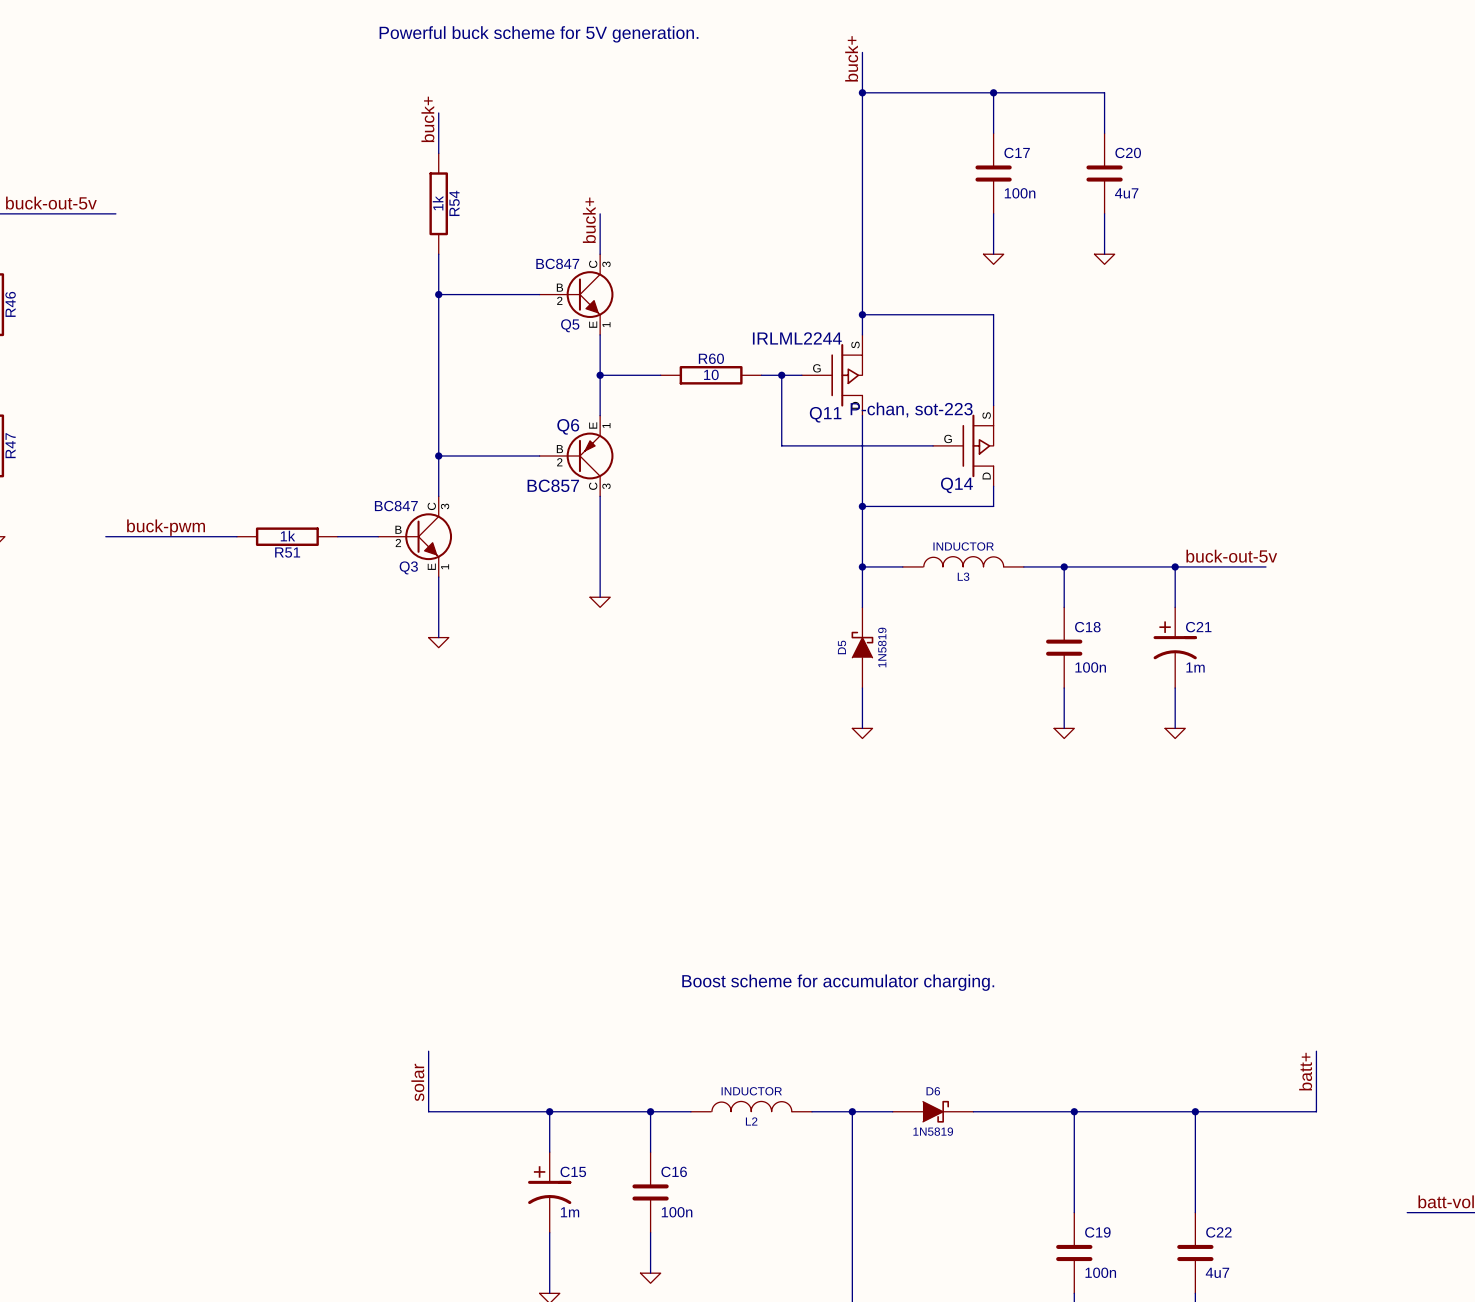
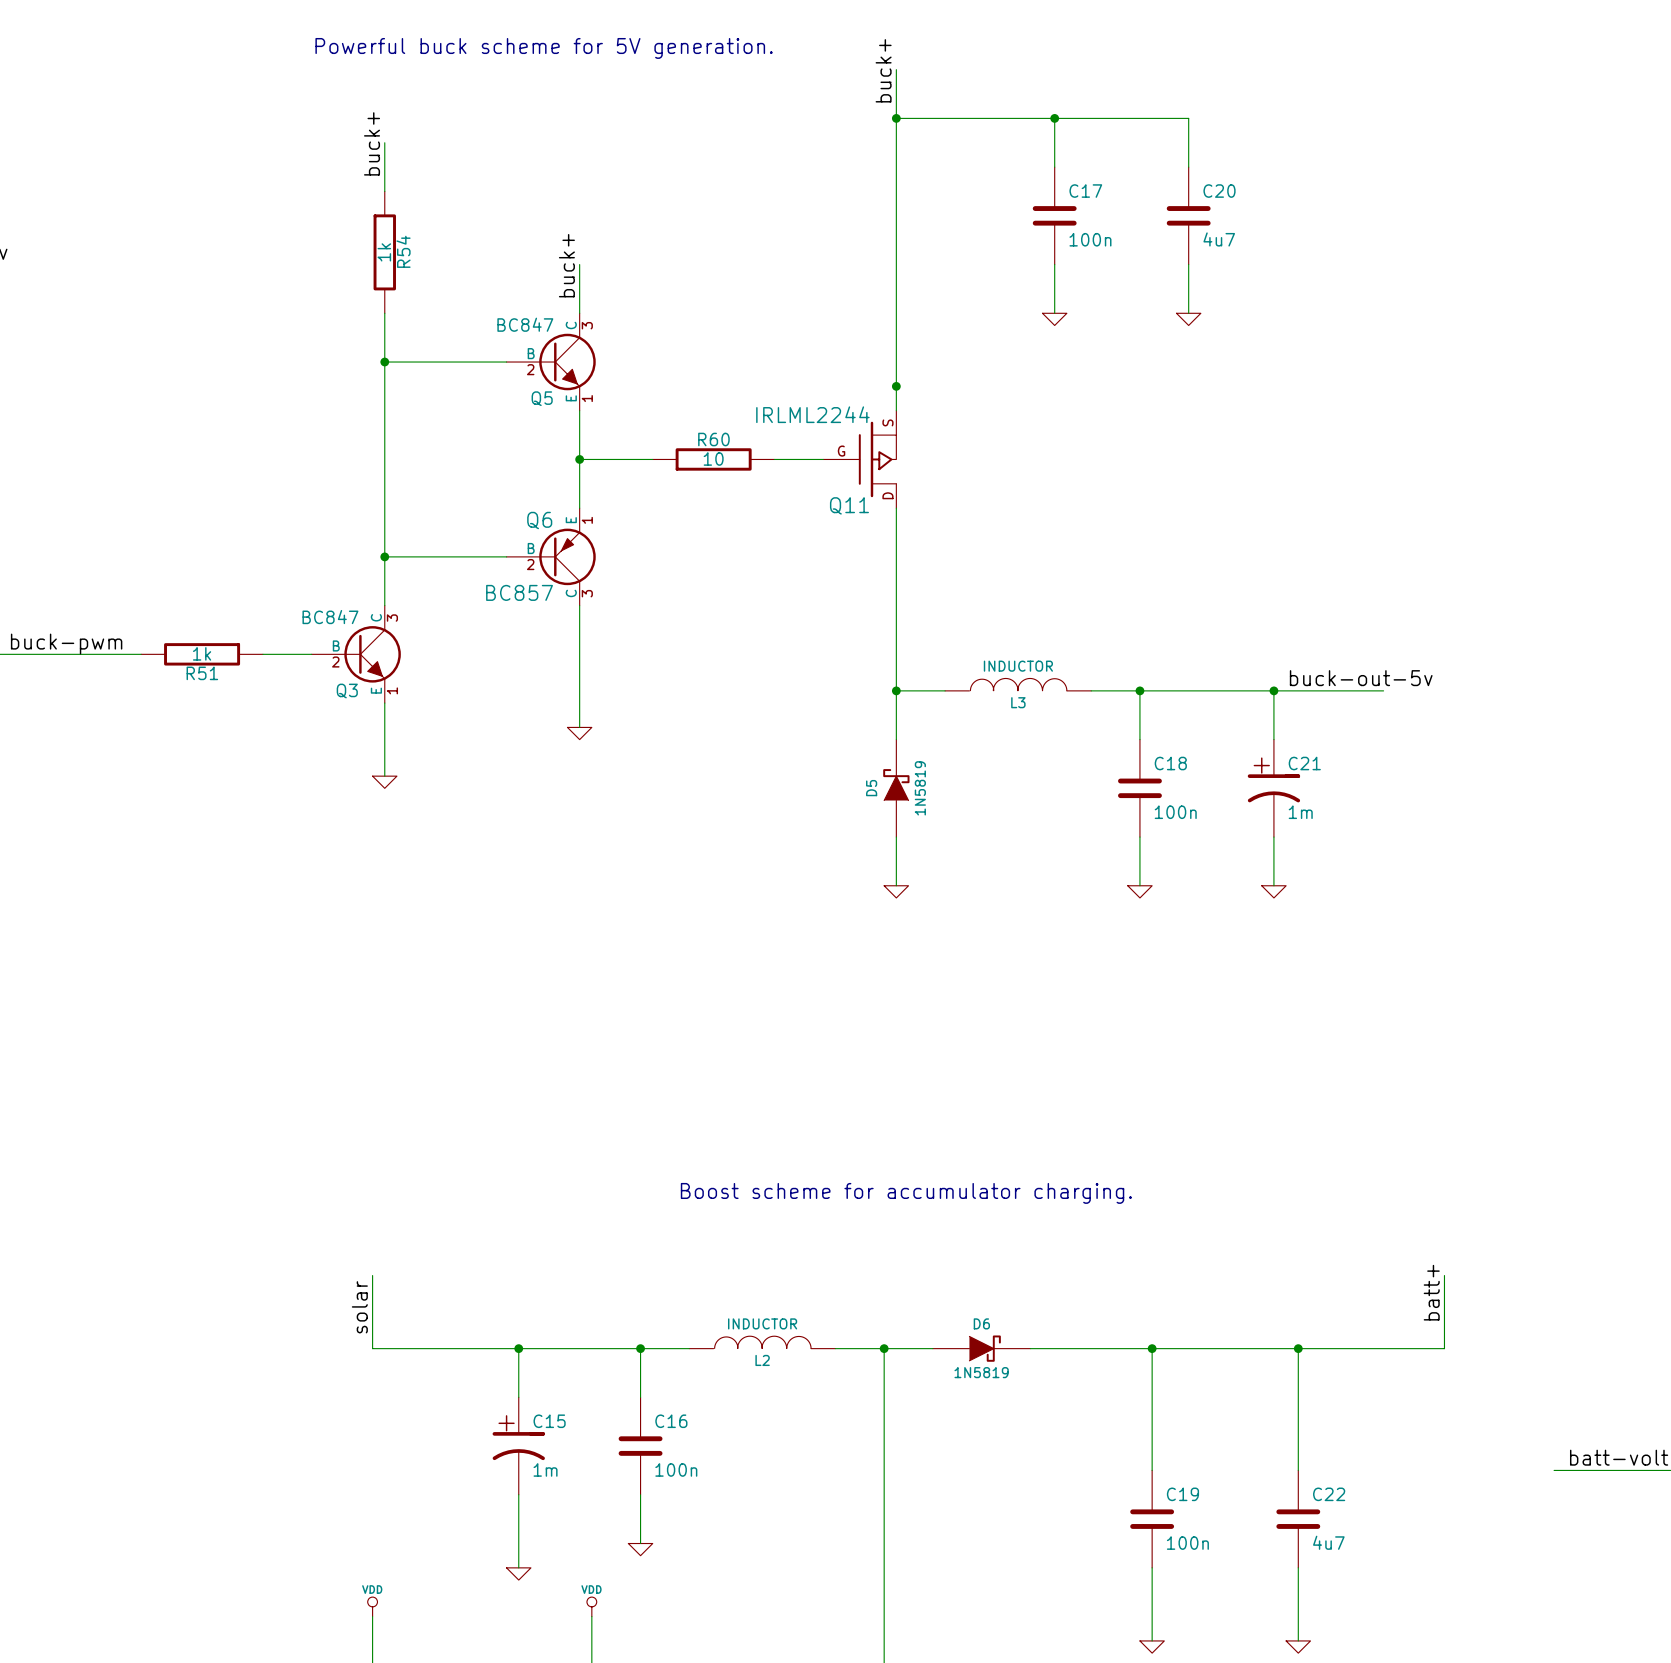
wire: (862, 314) (993, 314) (993, 405) -> none
wire: (781, 375) (781, 445) (933, 445) -> none
junction: (781, 375) -> none
Q14: P-chan, sot-223 (963, 445) -> none
wire: (993, 486) (993, 506) (862, 506) -> none
junction: (862, 506) -> none

